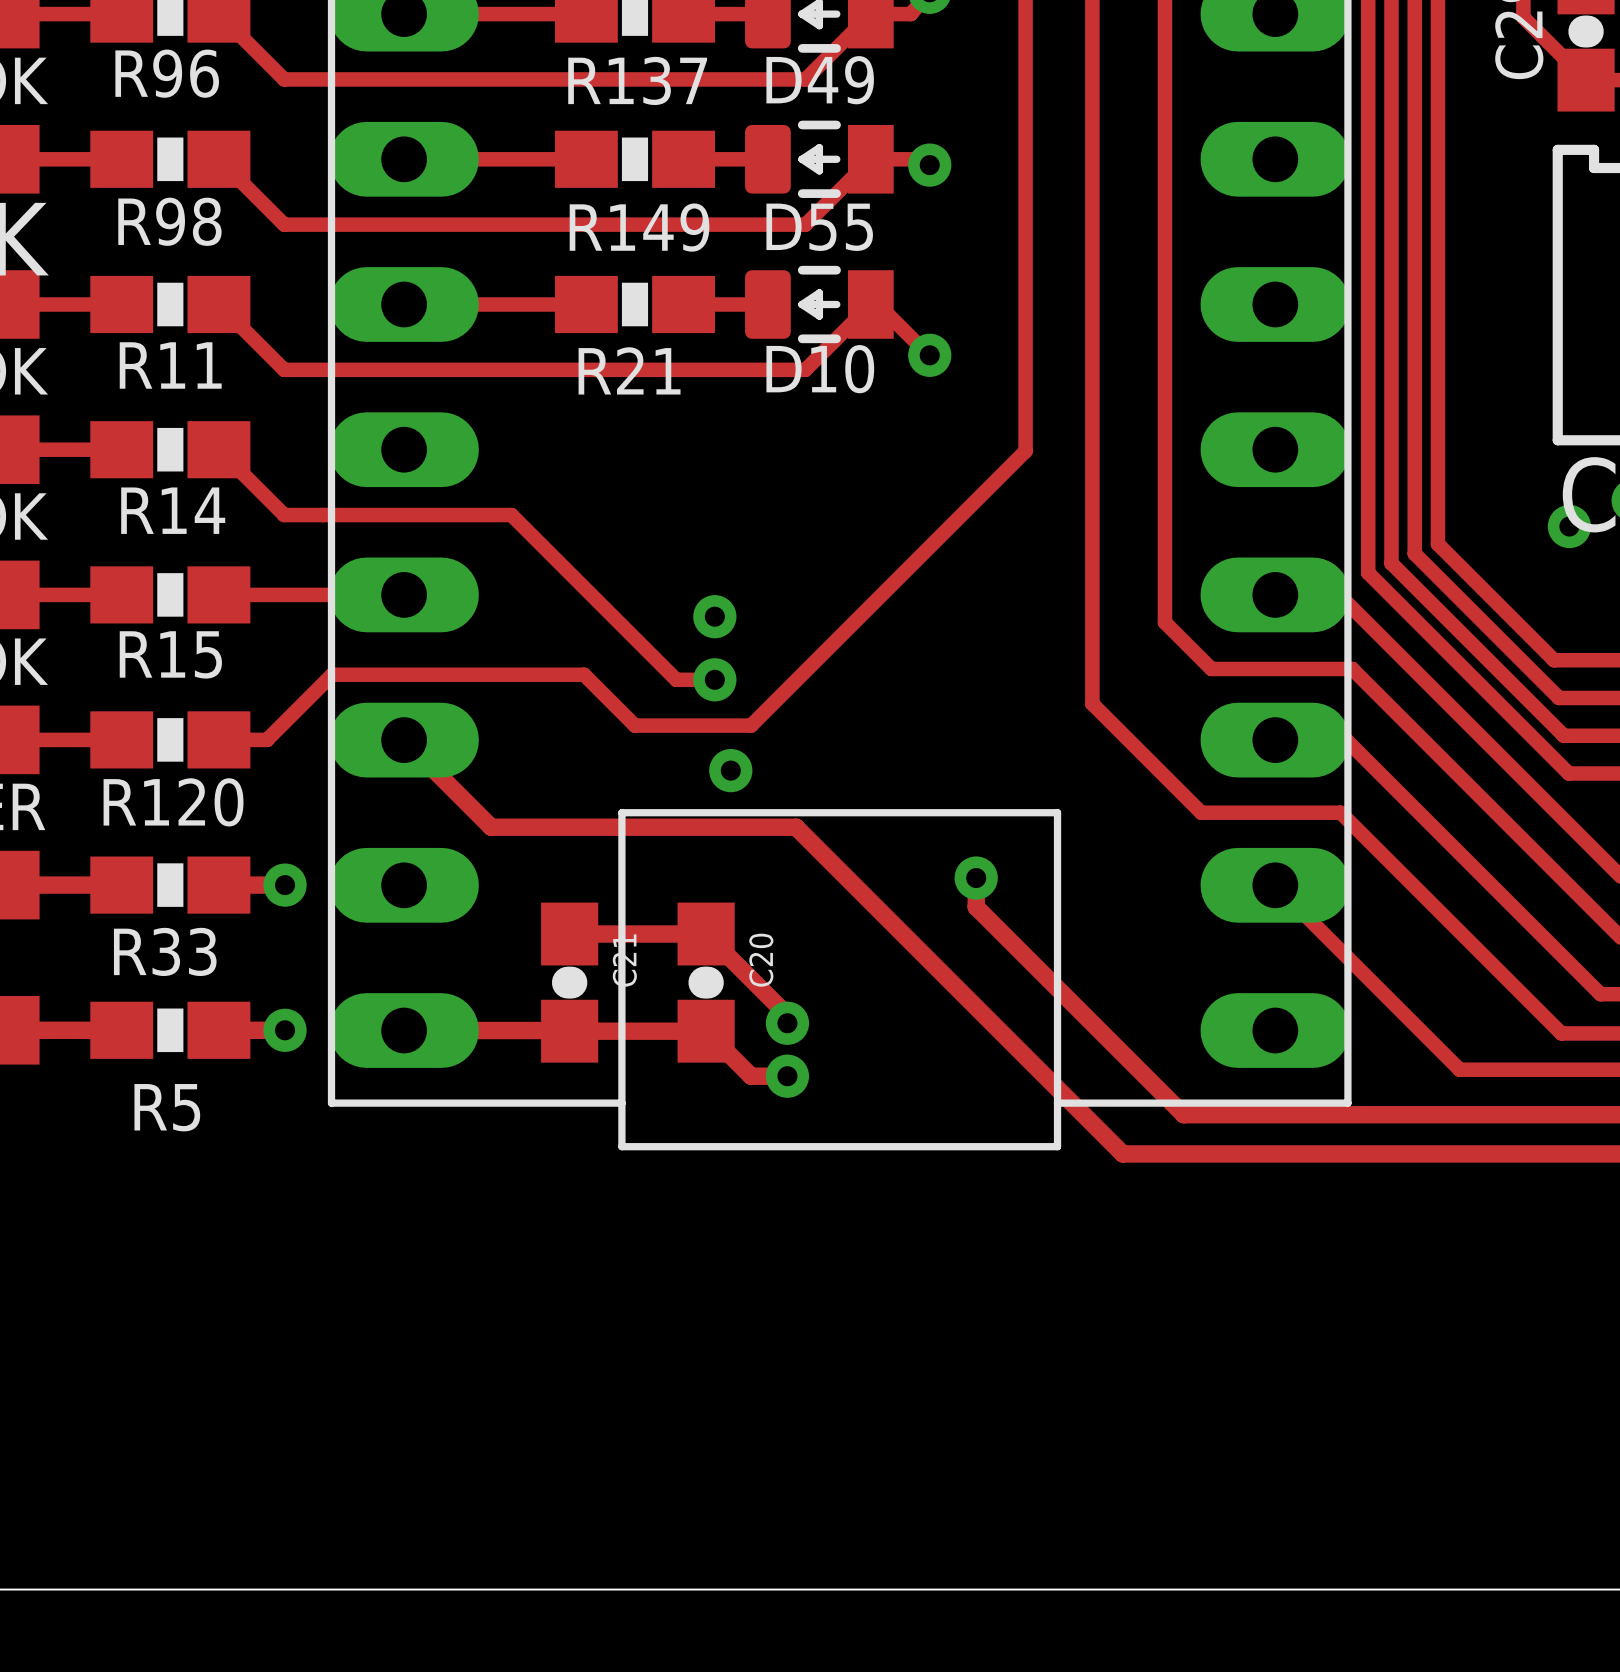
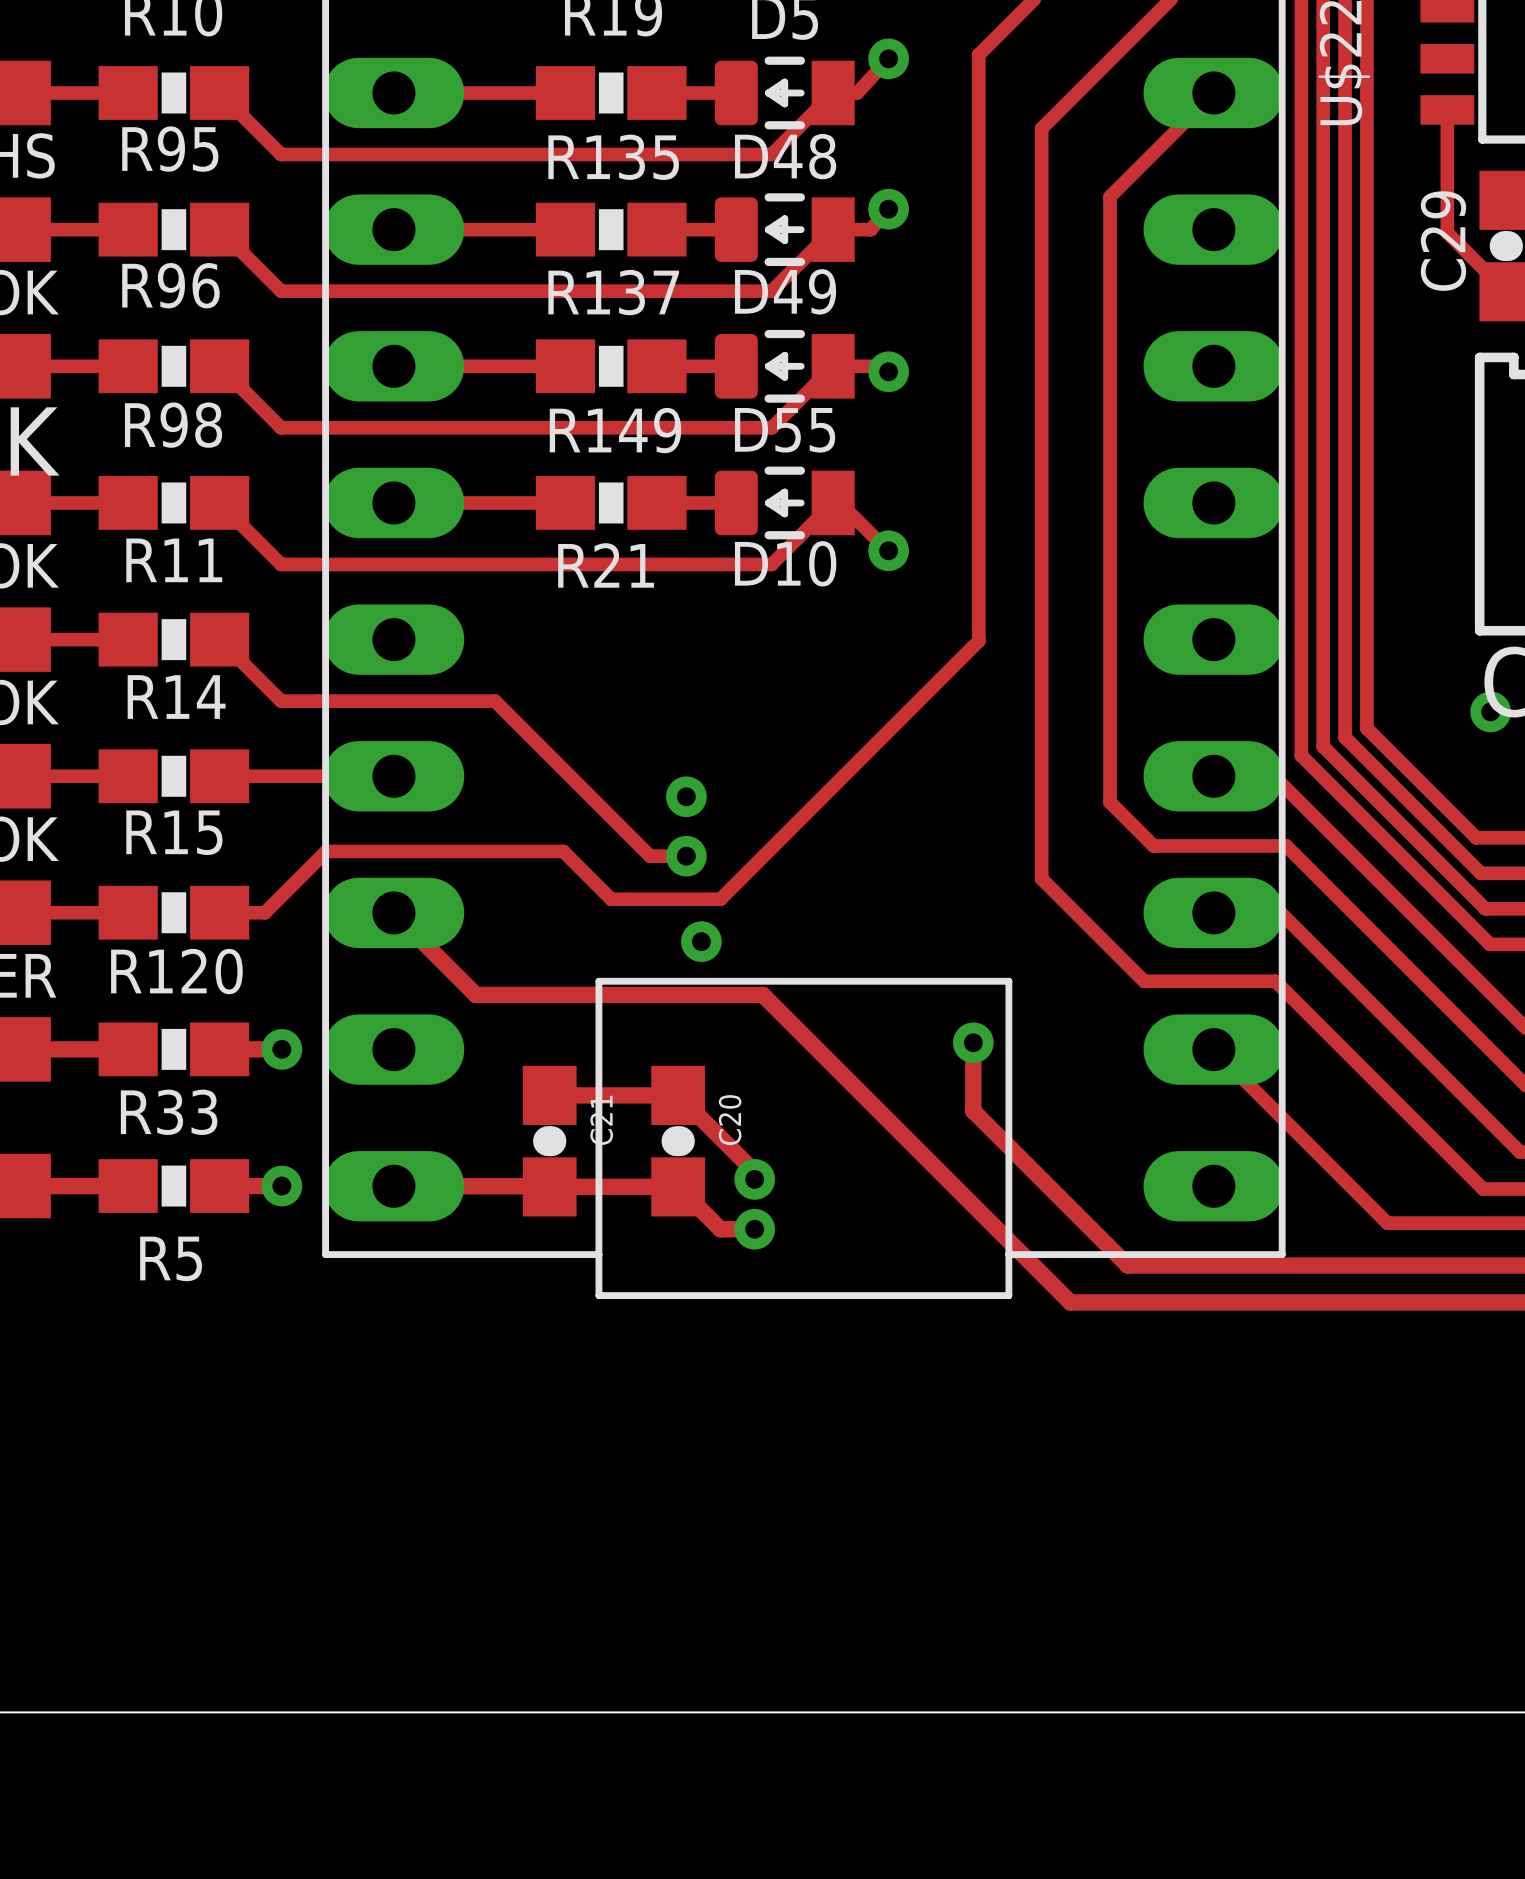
track: (976, 878) (976, 907) (1019, 950) -> (973, 1042) (973, 1111)
via position: (976, 878) -> (973, 1042)

